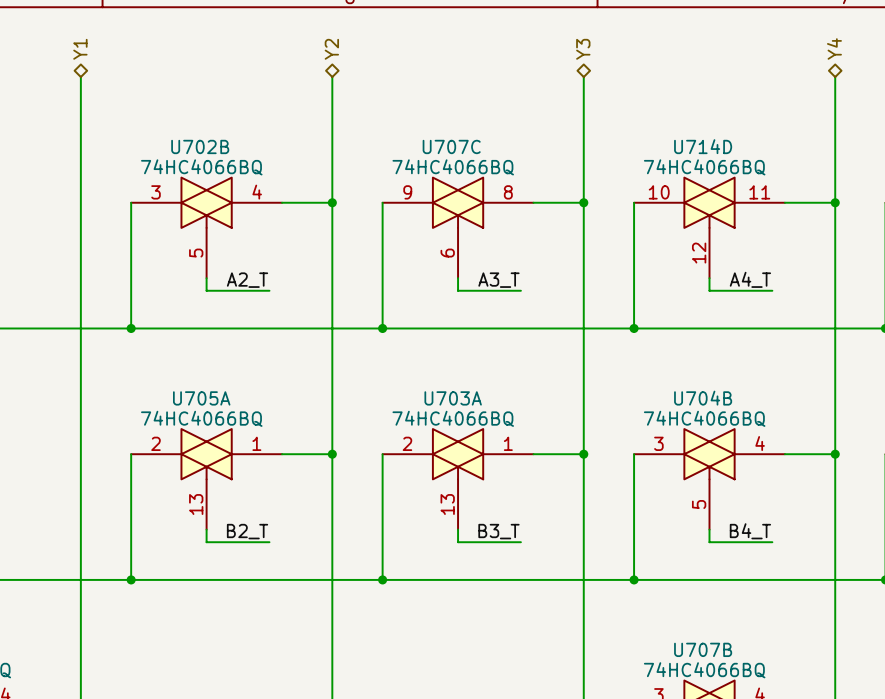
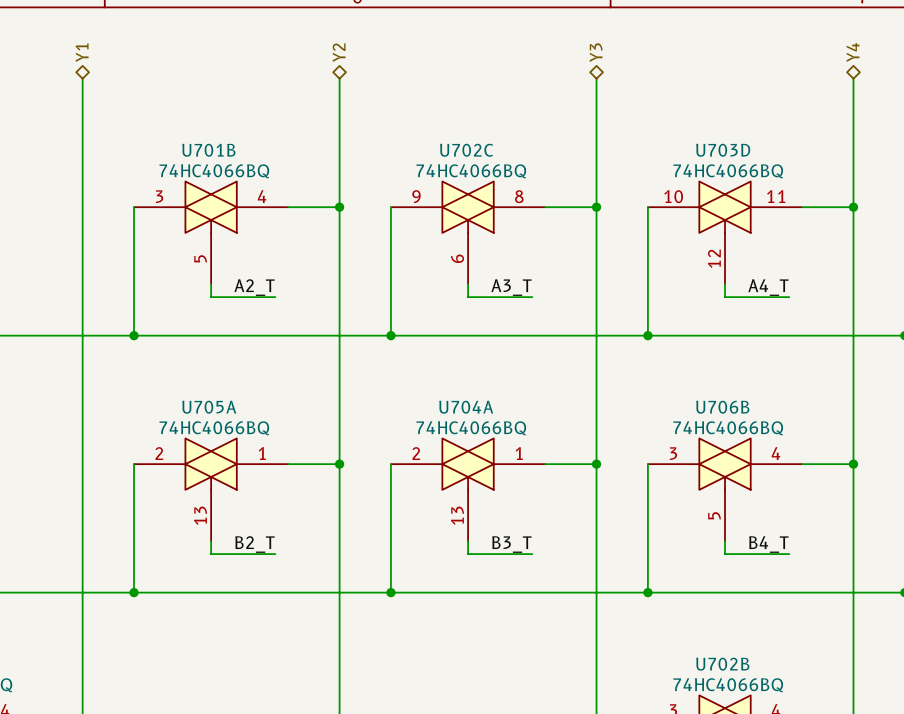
U702B name: U702B (200, 146) -> U701B (208, 150)
U707C name: U707C (451, 146) -> U702C (466, 150)
U714D name: U714D (703, 146) -> U703D (723, 150)
U703A name: U703A (453, 398) -> U704A (466, 407)
U704B name: U704B (703, 398) -> U706B (722, 407)
U707B name: U707B (703, 649) -> U702B (722, 664)

